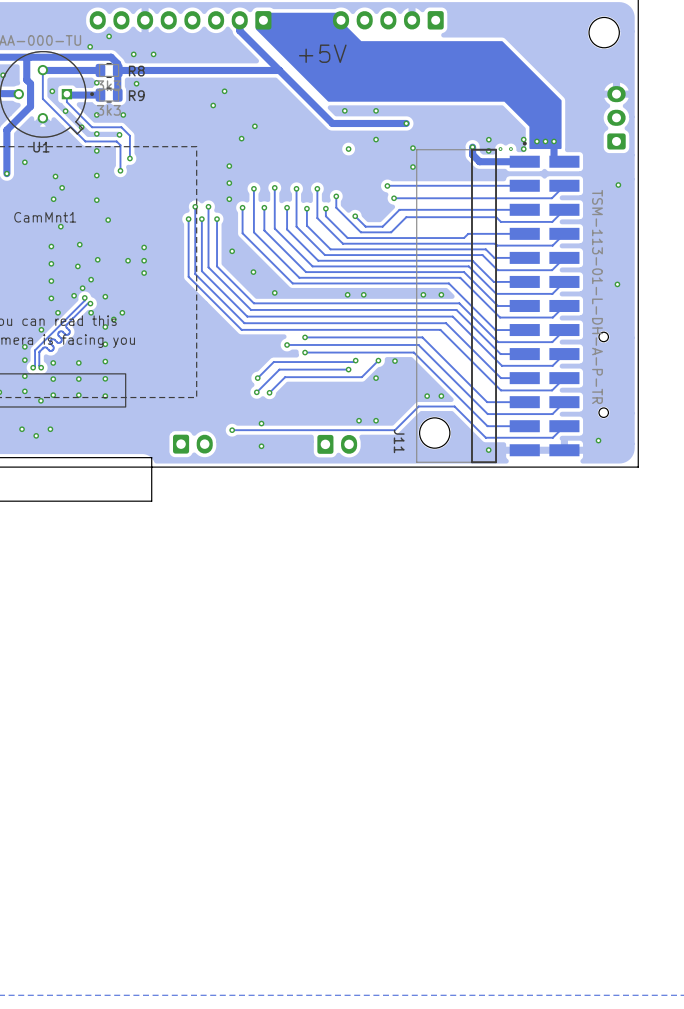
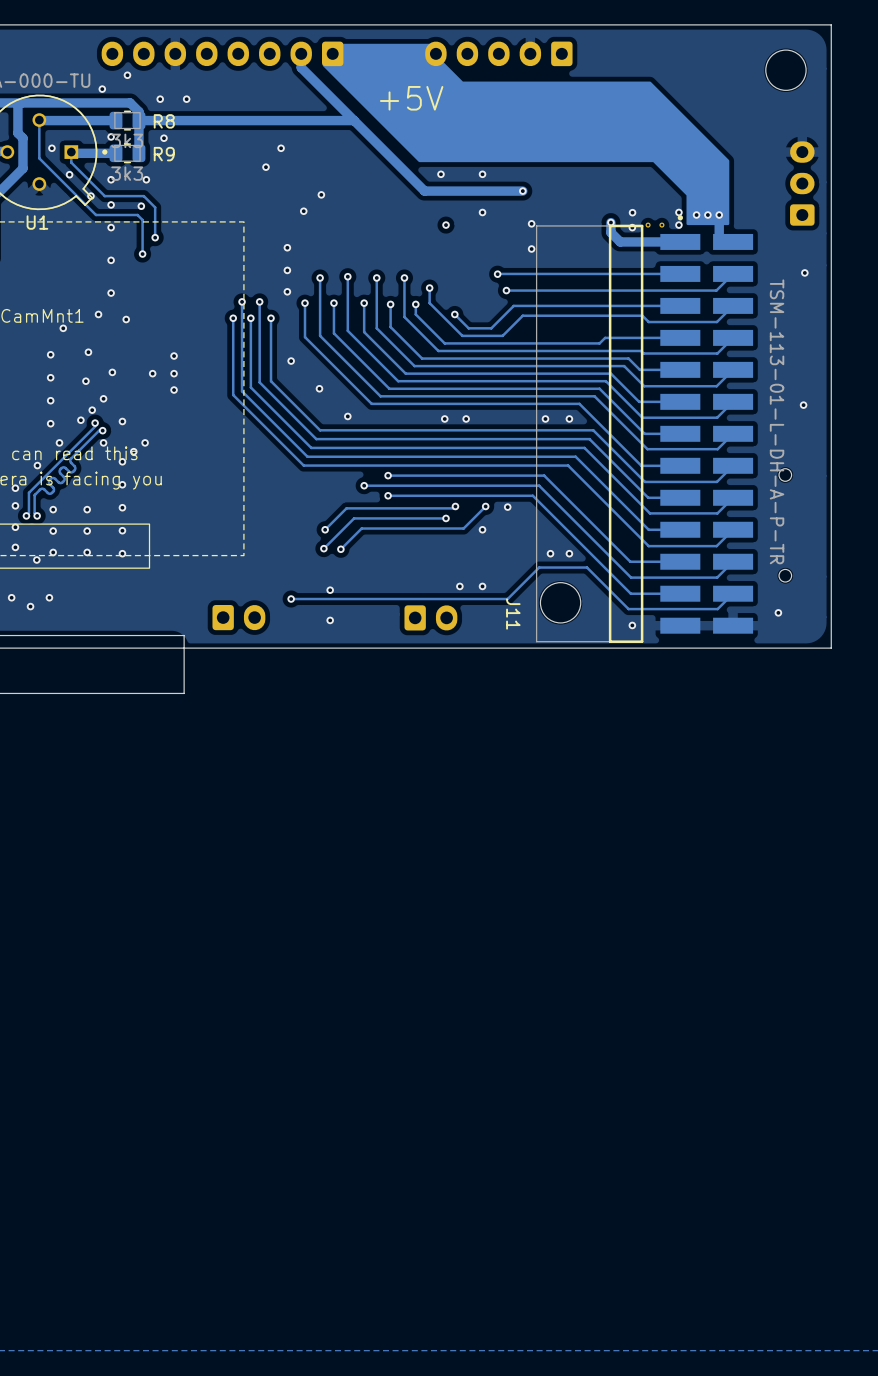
via: (24, 162) -> none
via: (55, 176) -> none
via: (62, 187) -> none
via: (53, 199) -> none
via: none -> (98, 314)

